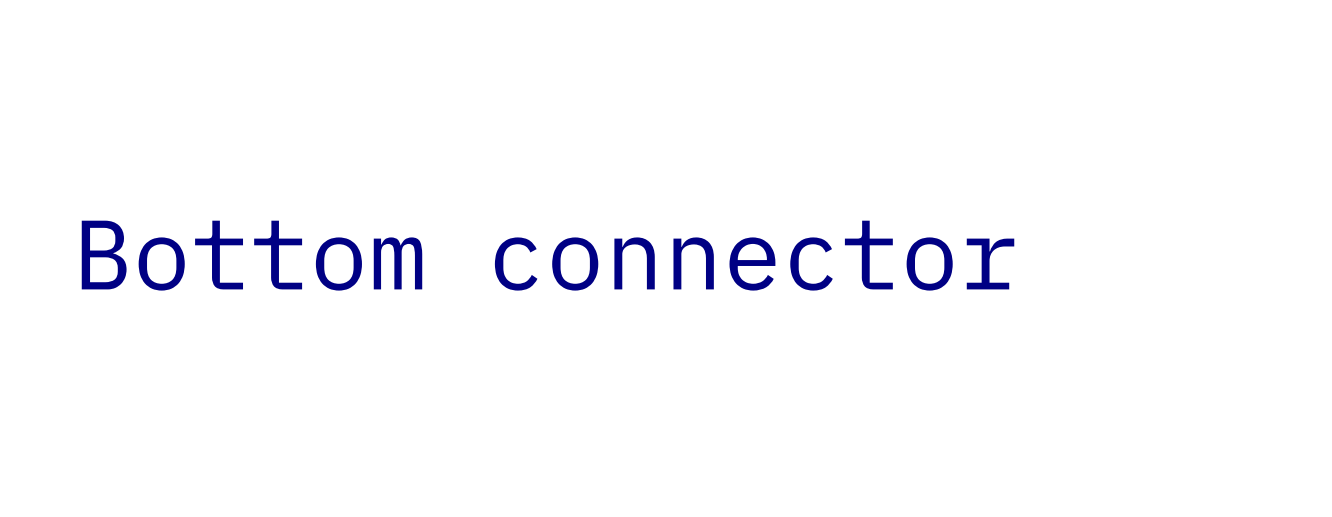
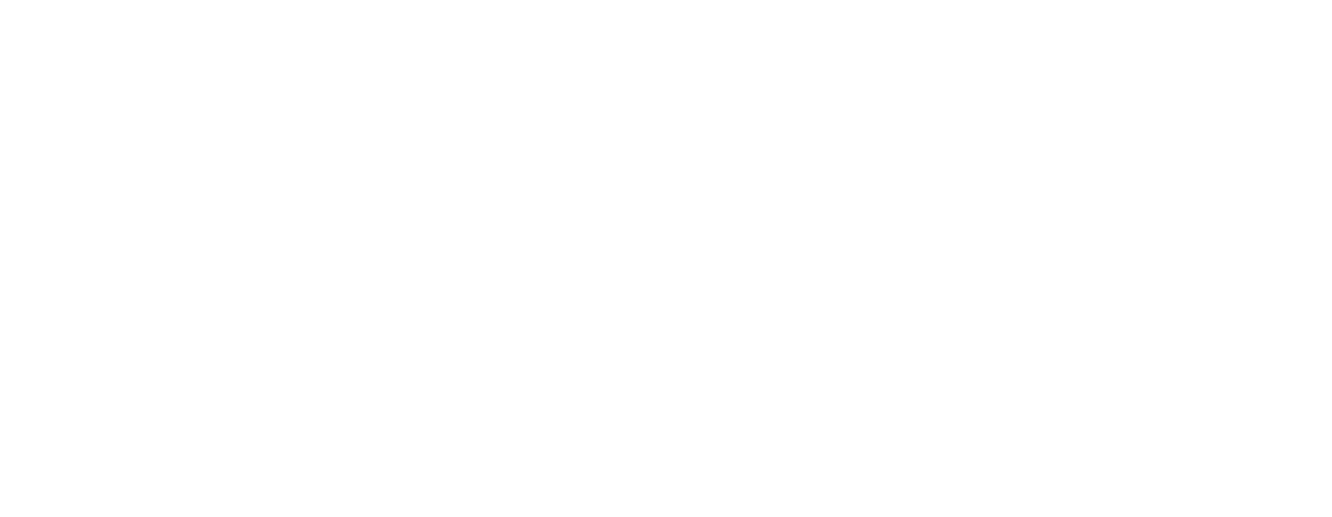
text: Bottom connector (548, 255) -> none

